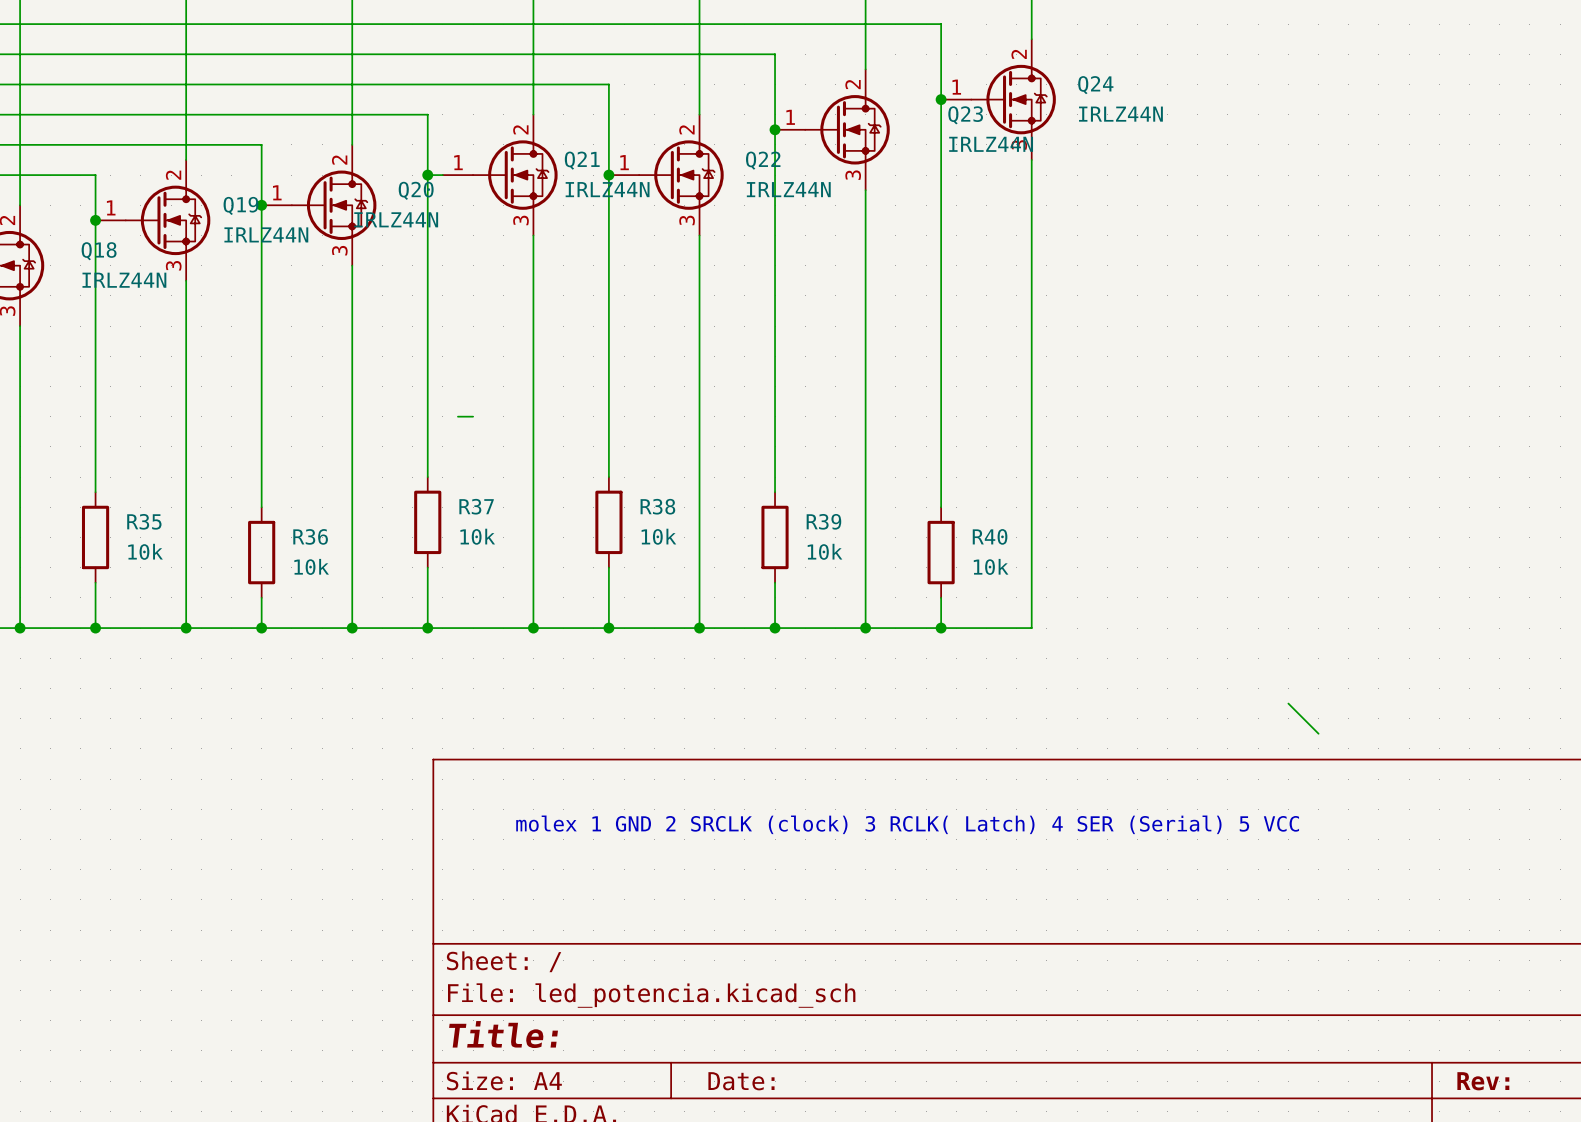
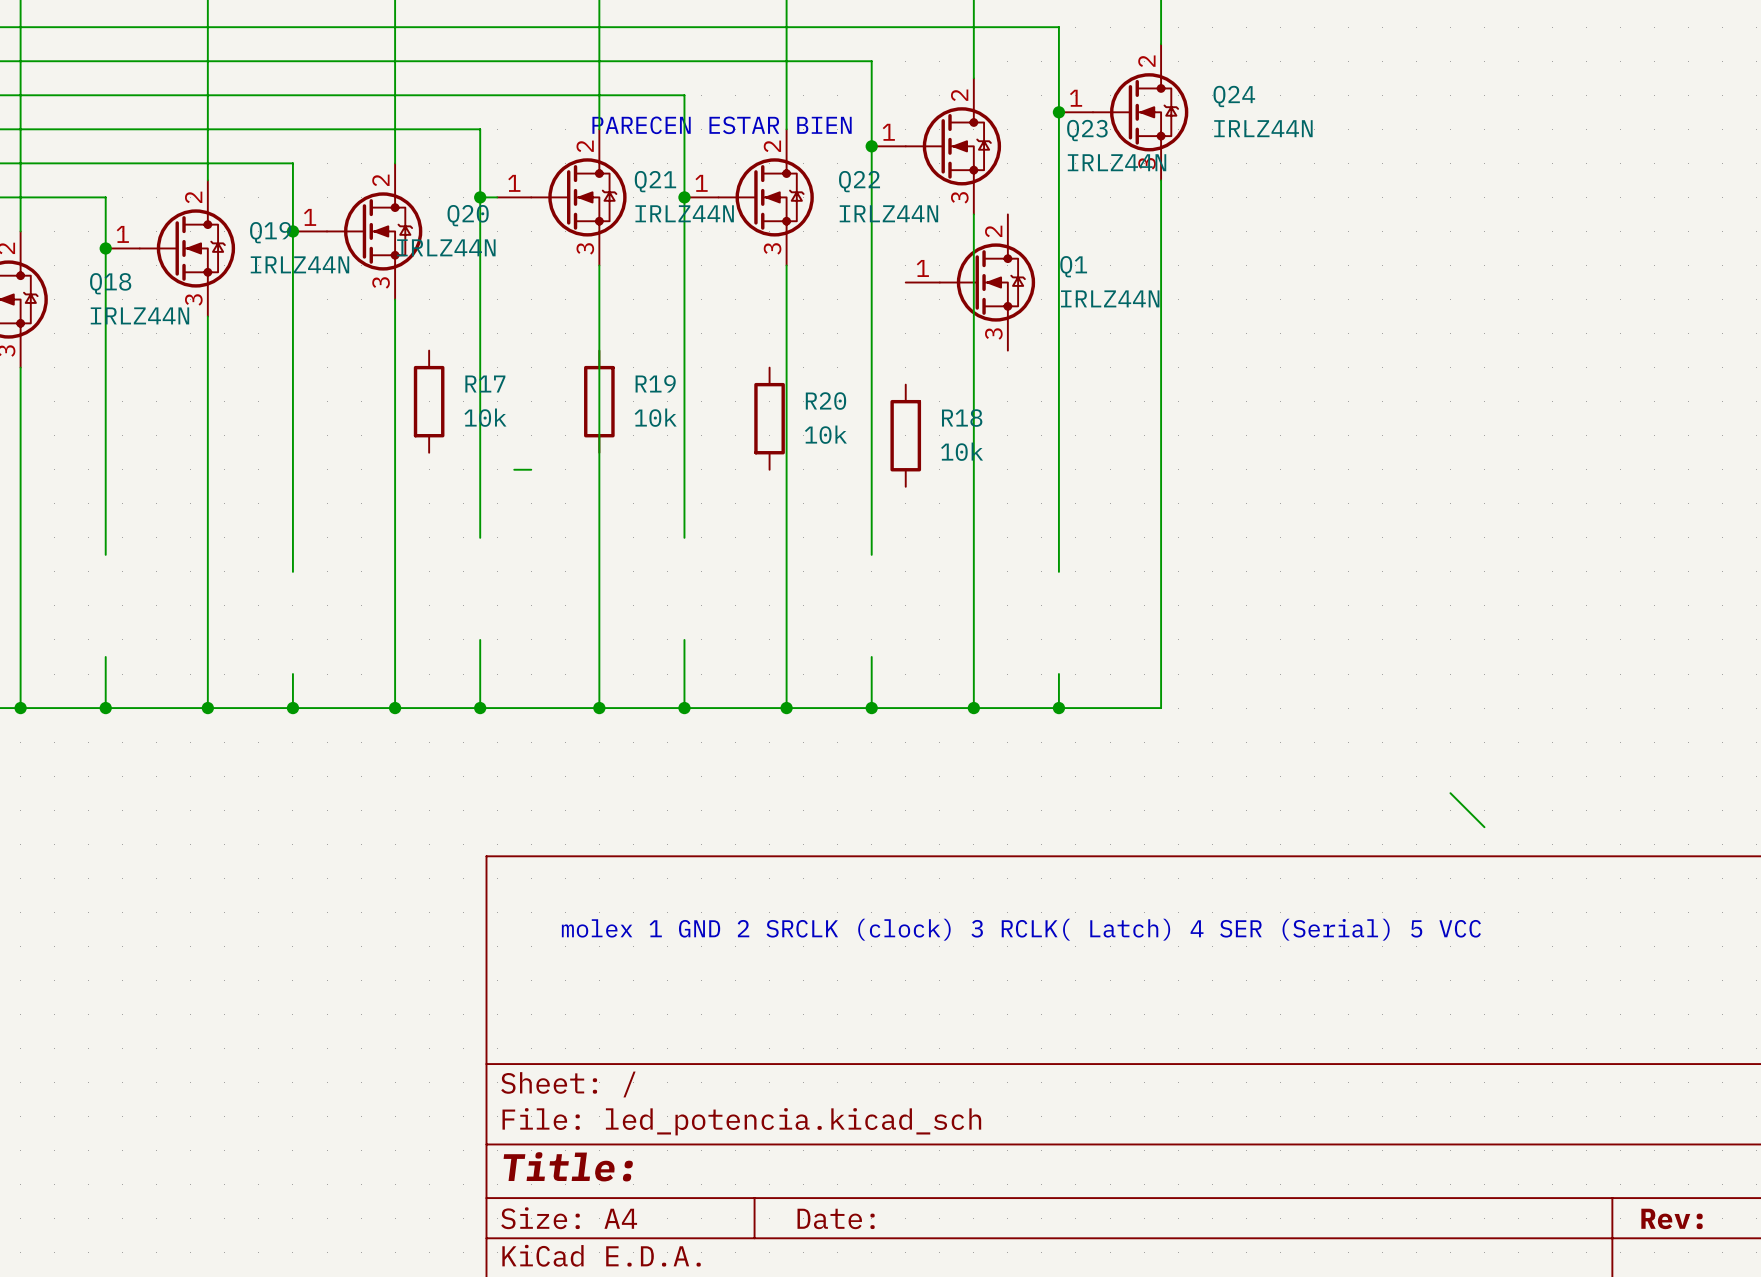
text: none -> PARECEN ESTAR BIEN (722, 125)
Q1: none -> IRLZ44N (970, 282)
R17: none -> 10k (429, 401)
R19: none -> 10k (599, 401)
R20: none -> 10k (769, 418)
R18: none -> 10k (905, 435)
R37: 10k (427, 522) -> none
R38: 10k (608, 522) -> none
R35: 10k (95, 537) -> none
R39: 10k (775, 537) -> none
R36: 10k (261, 552) -> none
R40: 10k (941, 552) -> none

